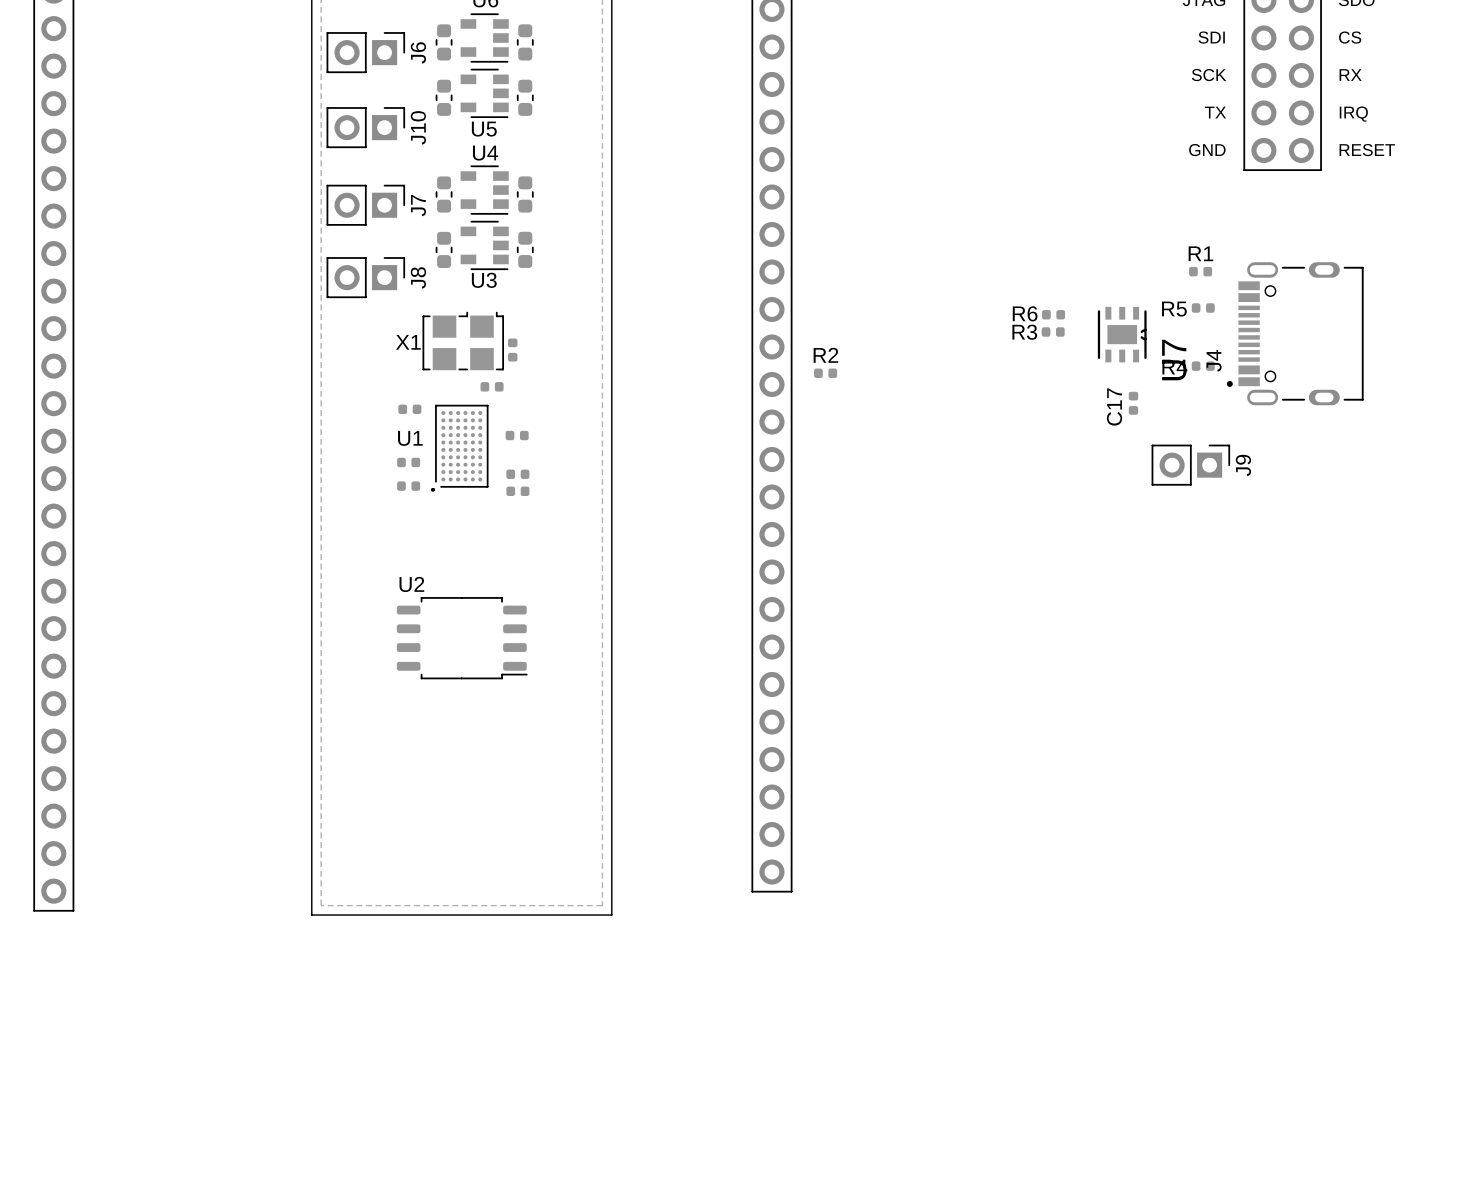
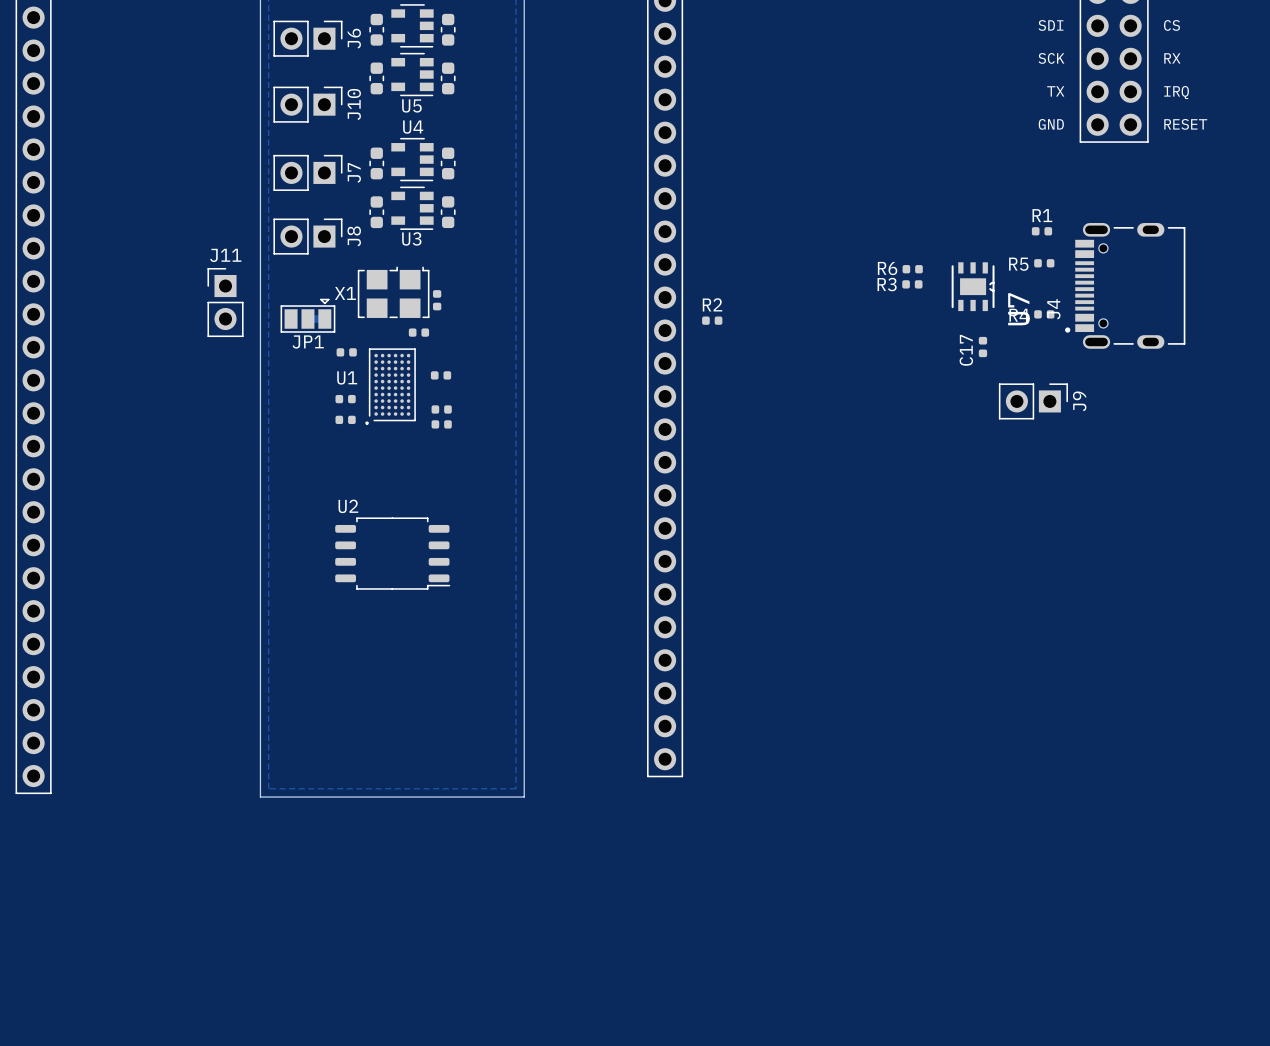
J11: none -> (225, 302)
JP1: none -> (307, 315)

